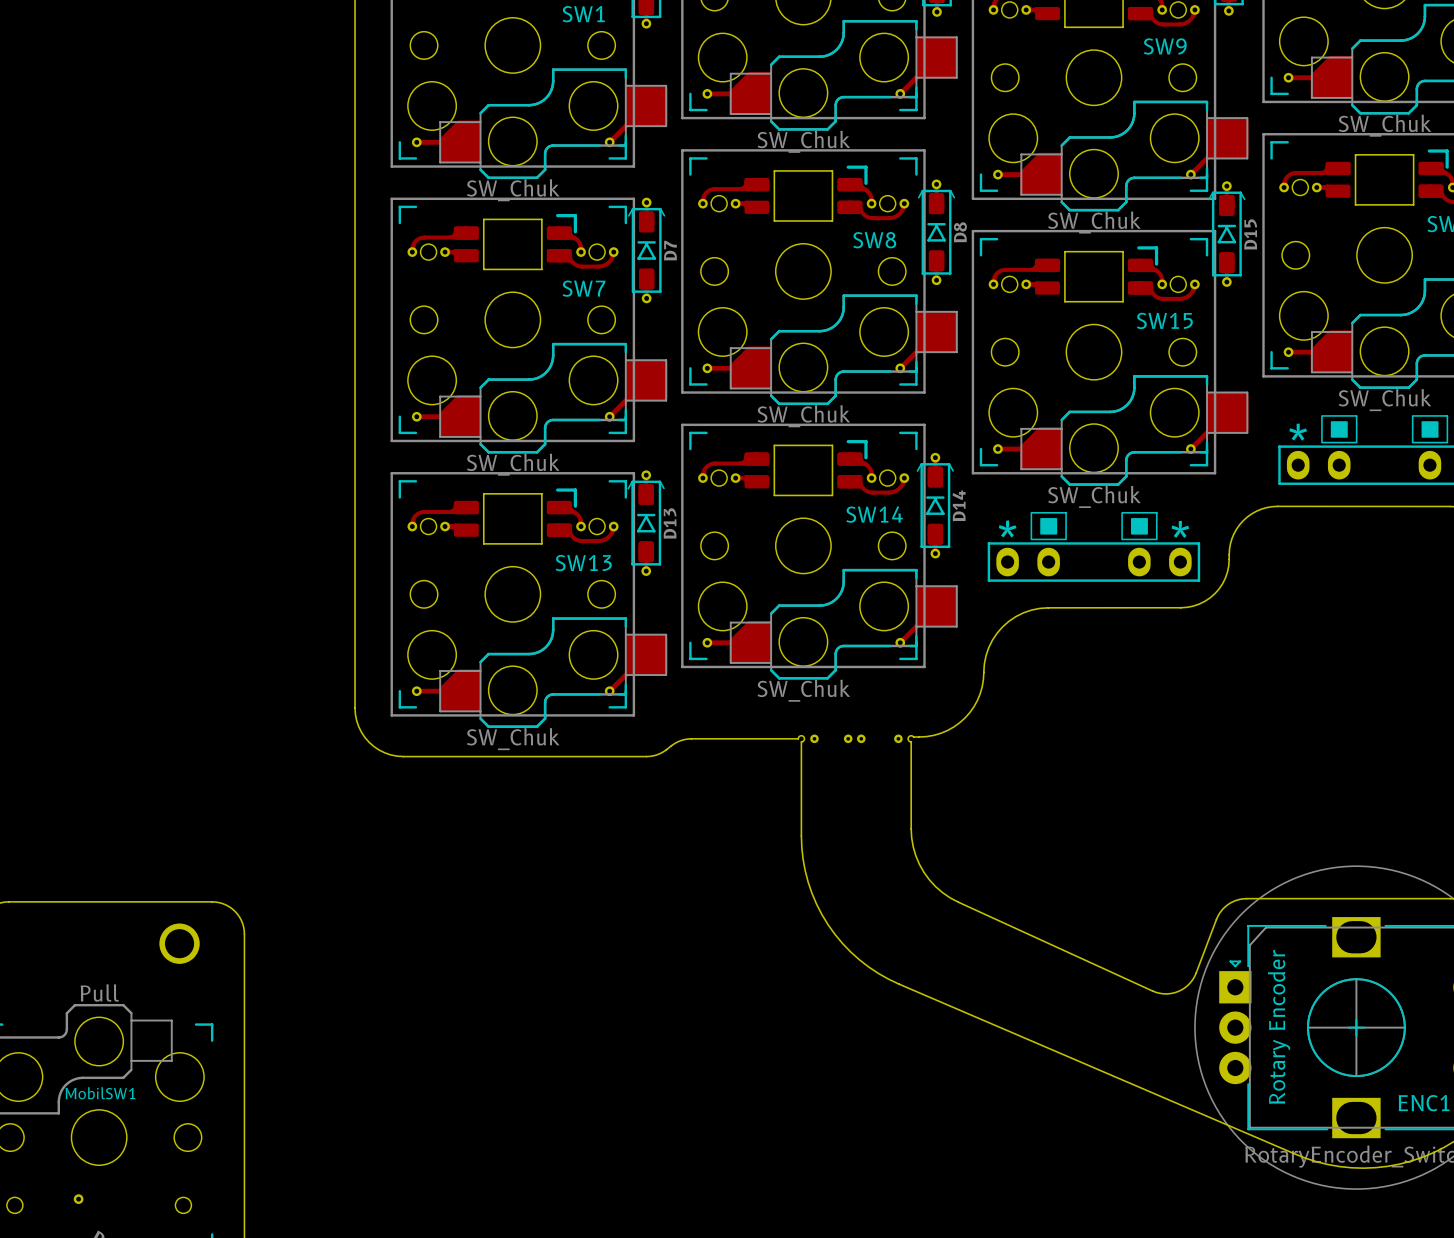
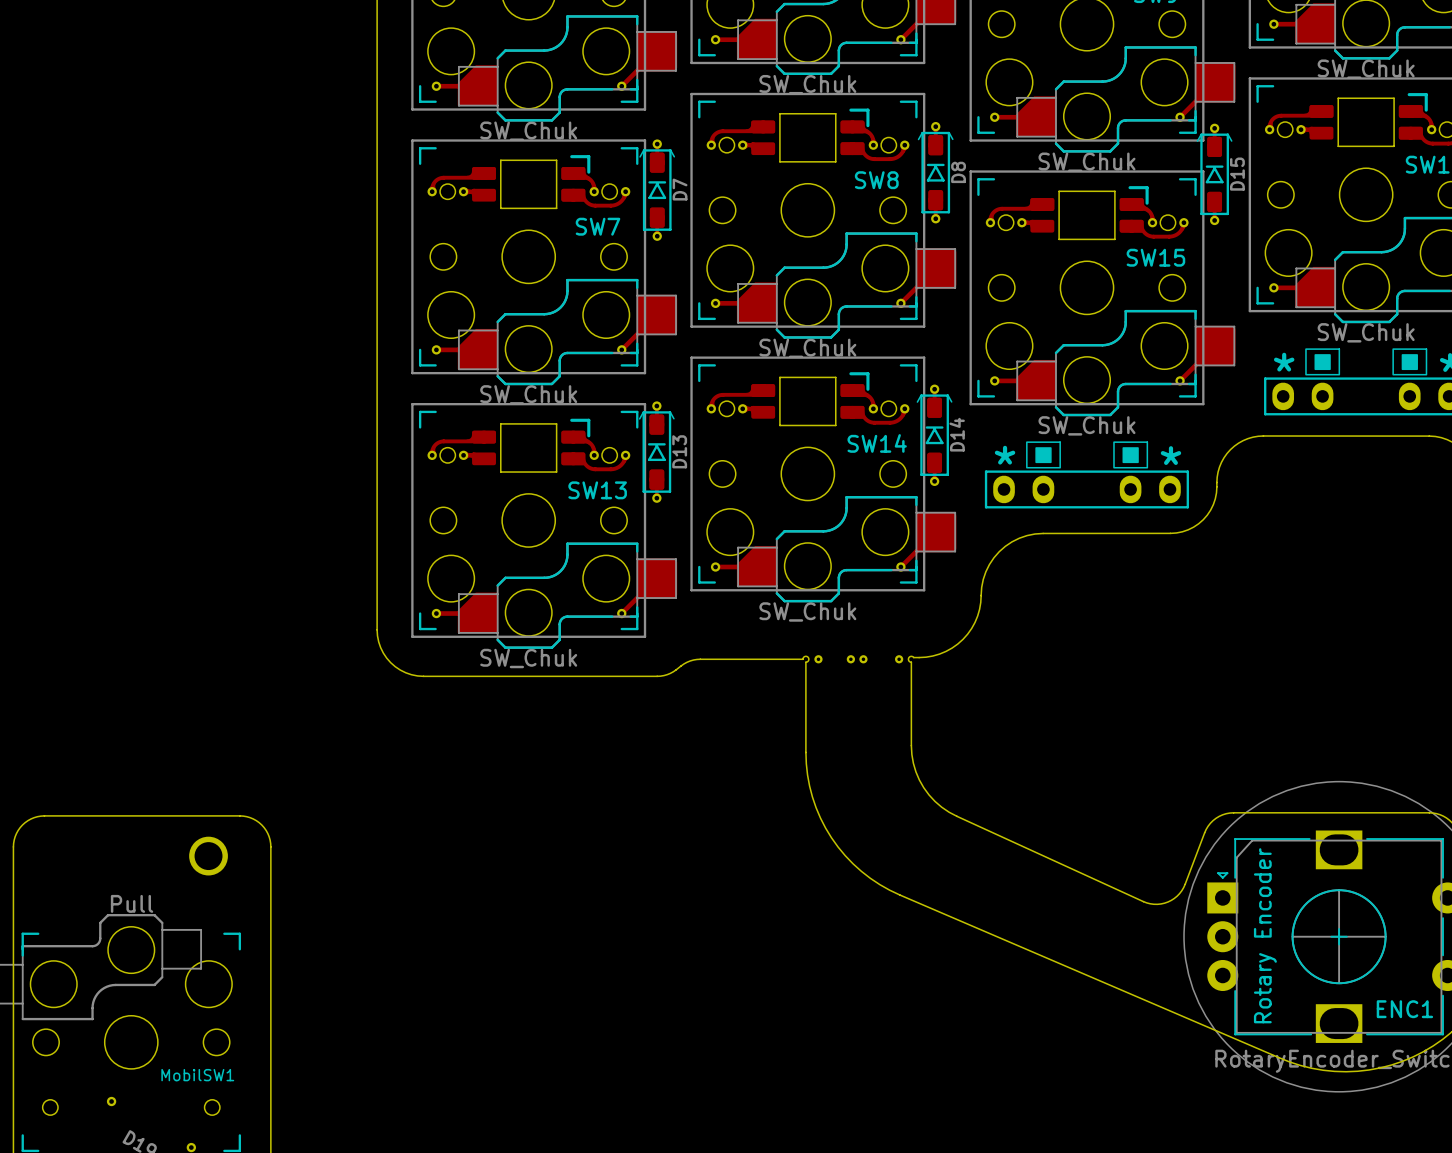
MobilSW1 name position: MobilSW1 (100, 1093) -> MobilSW1 (197, 1075)

